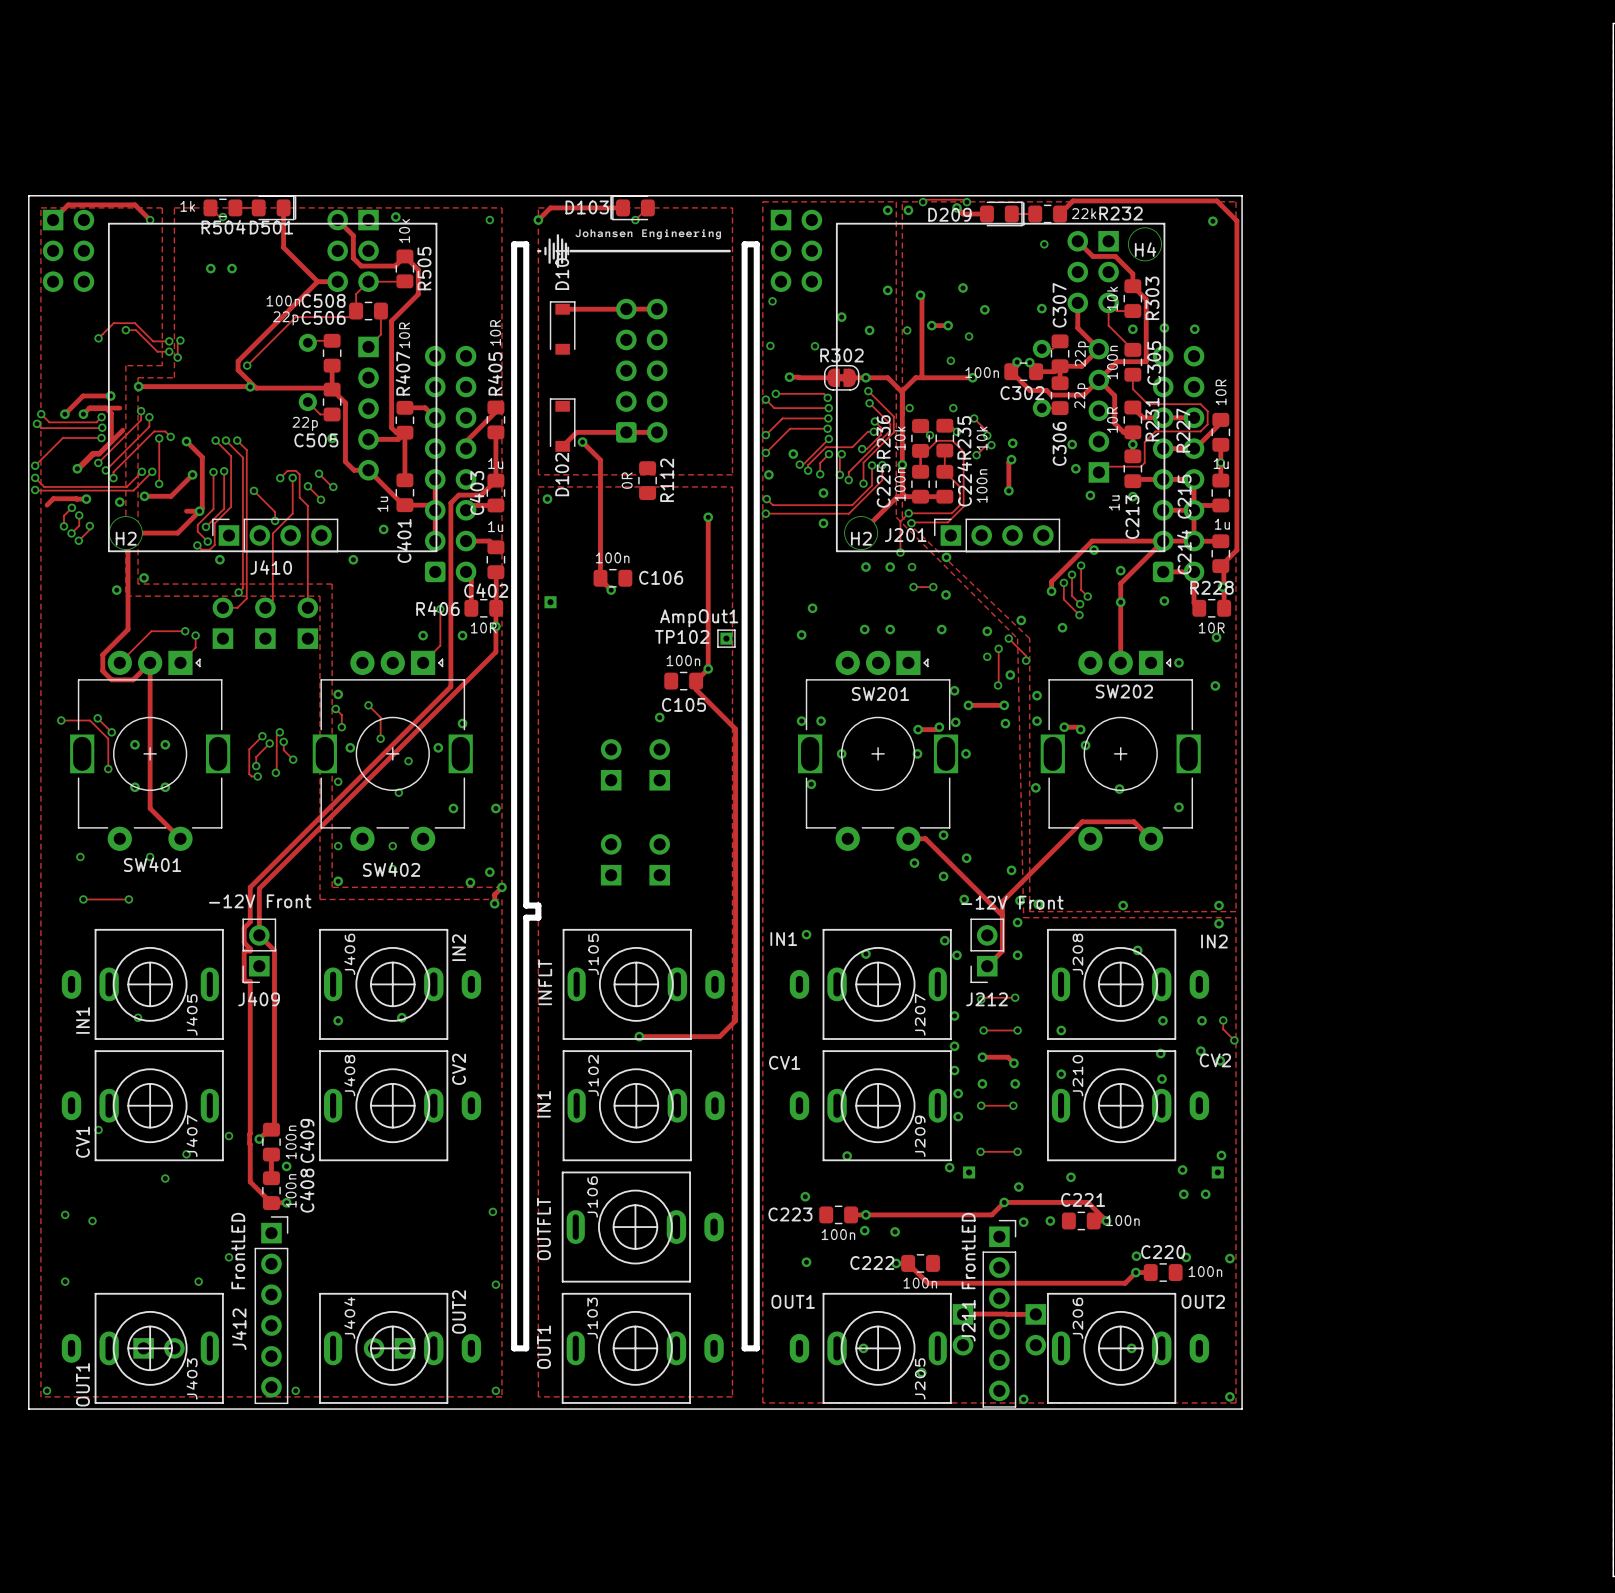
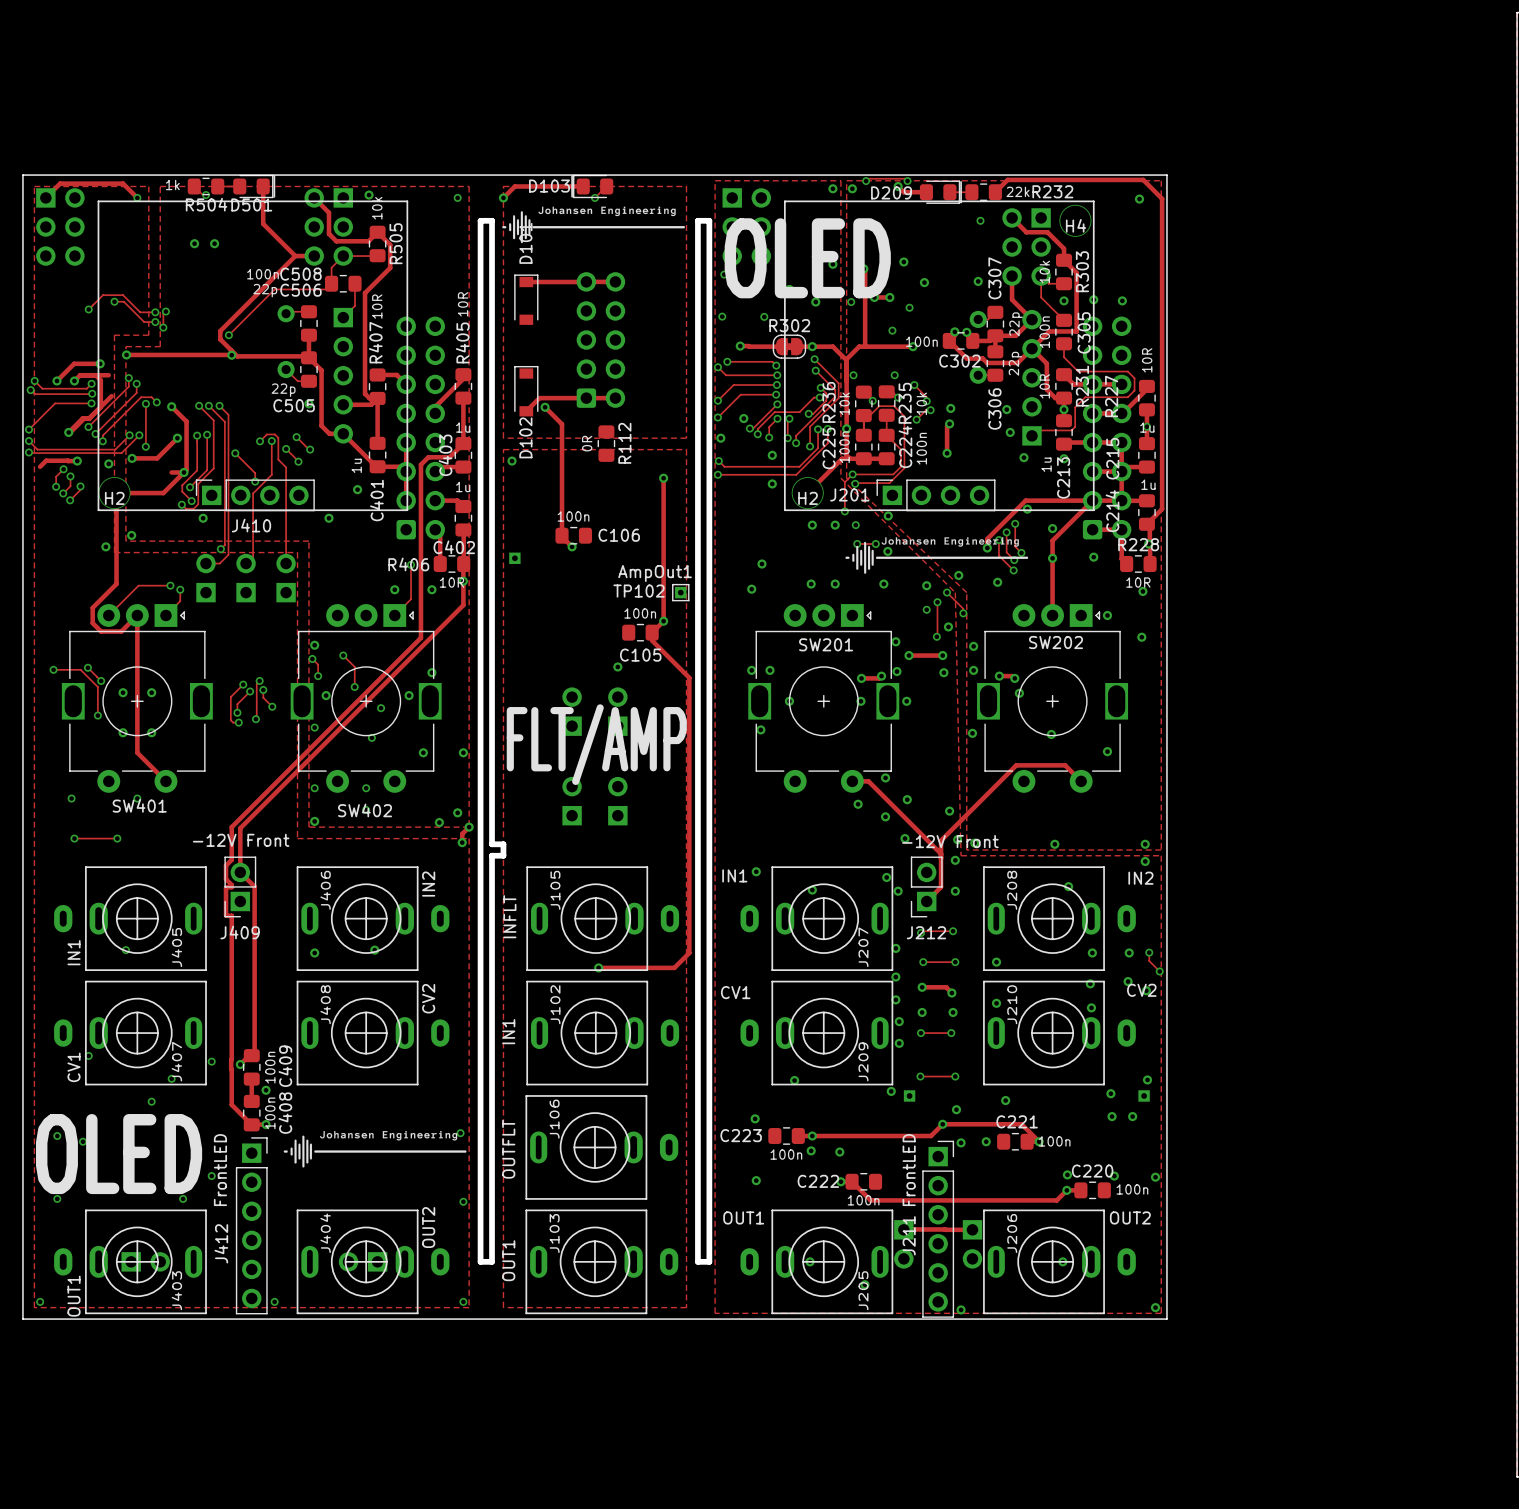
text: none -> OLED (807, 258)
drawing: none -> [845, 537, 1029, 574]
text: none -> FLT/AMP (596, 744)
drawing: none -> [283, 1131, 467, 1168]
text: none -> OLED (119, 1154)

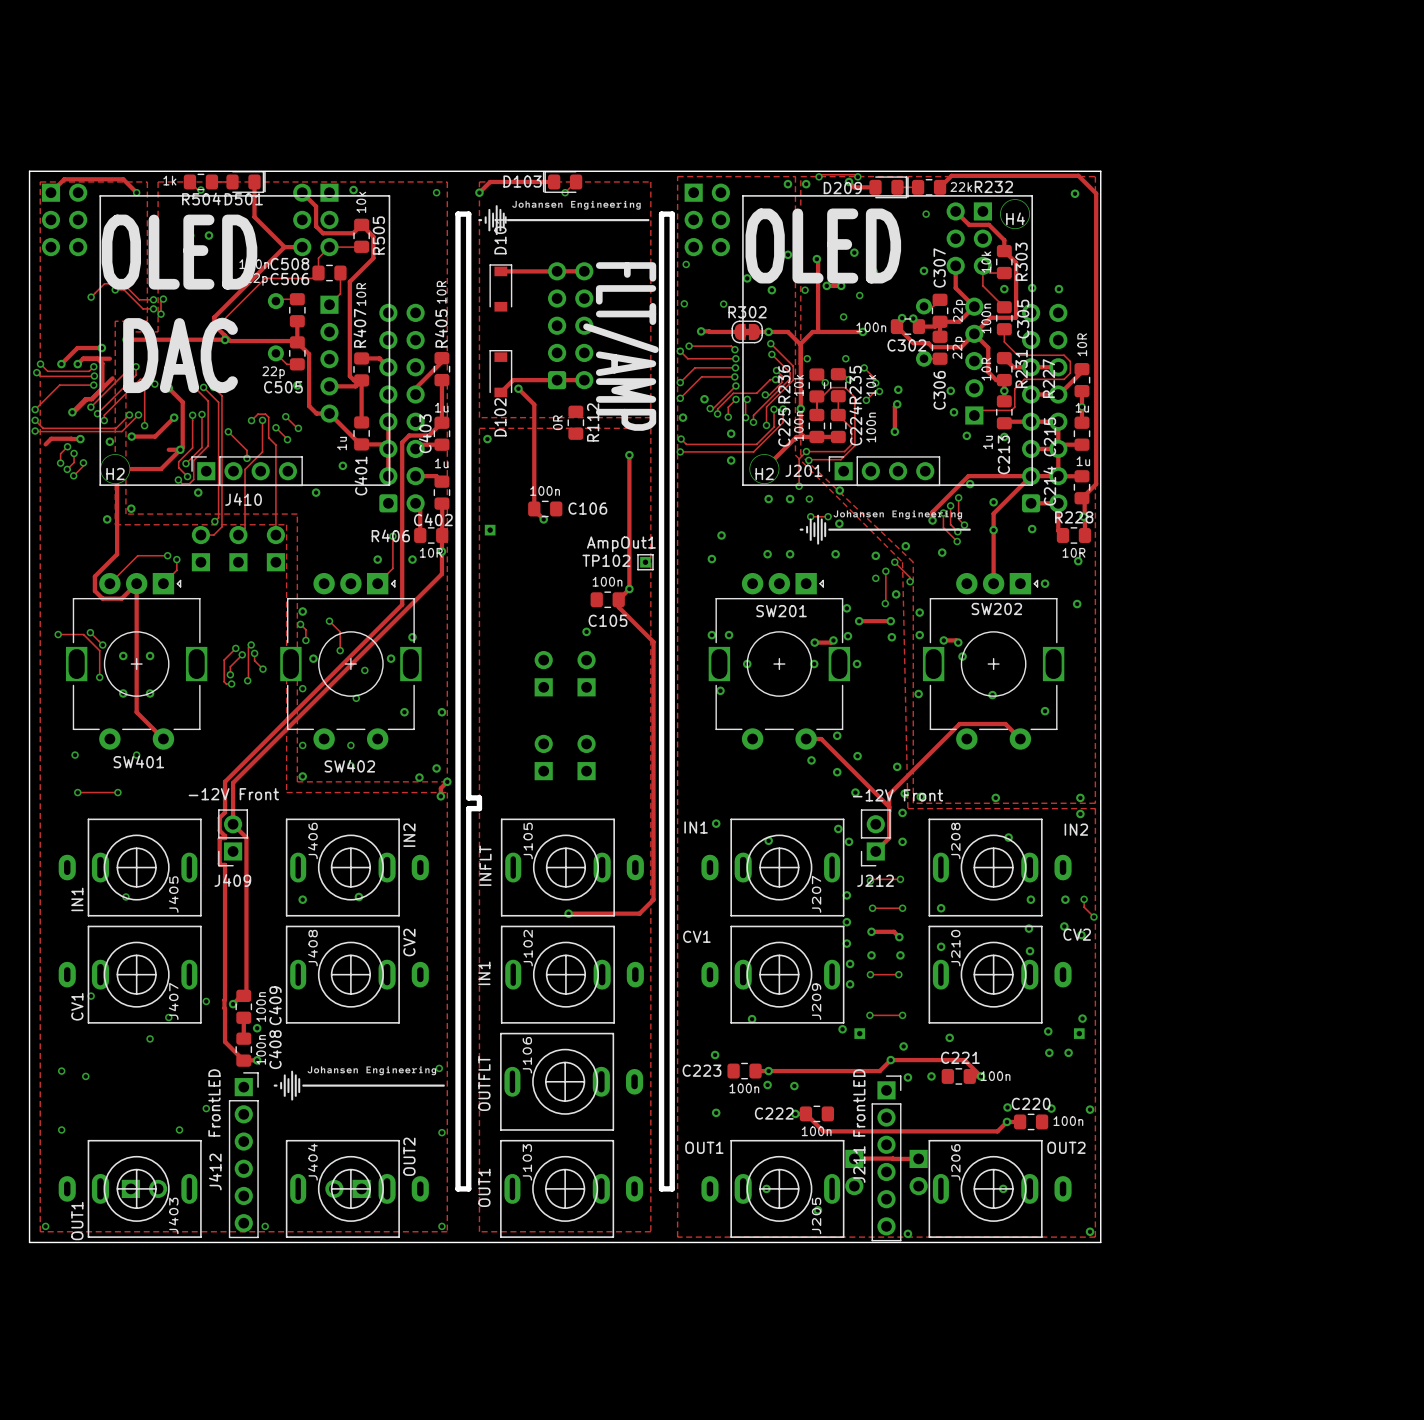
text position: OLED (807, 258) -> OLED (823, 245)
text: none -> OLED (179, 252)
text: none -> FLT/AMP (620, 346)
text: none -> DAC (180, 355)
text: FLT/AMP (596, 744) -> none
text: OLED (119, 1154) -> none

